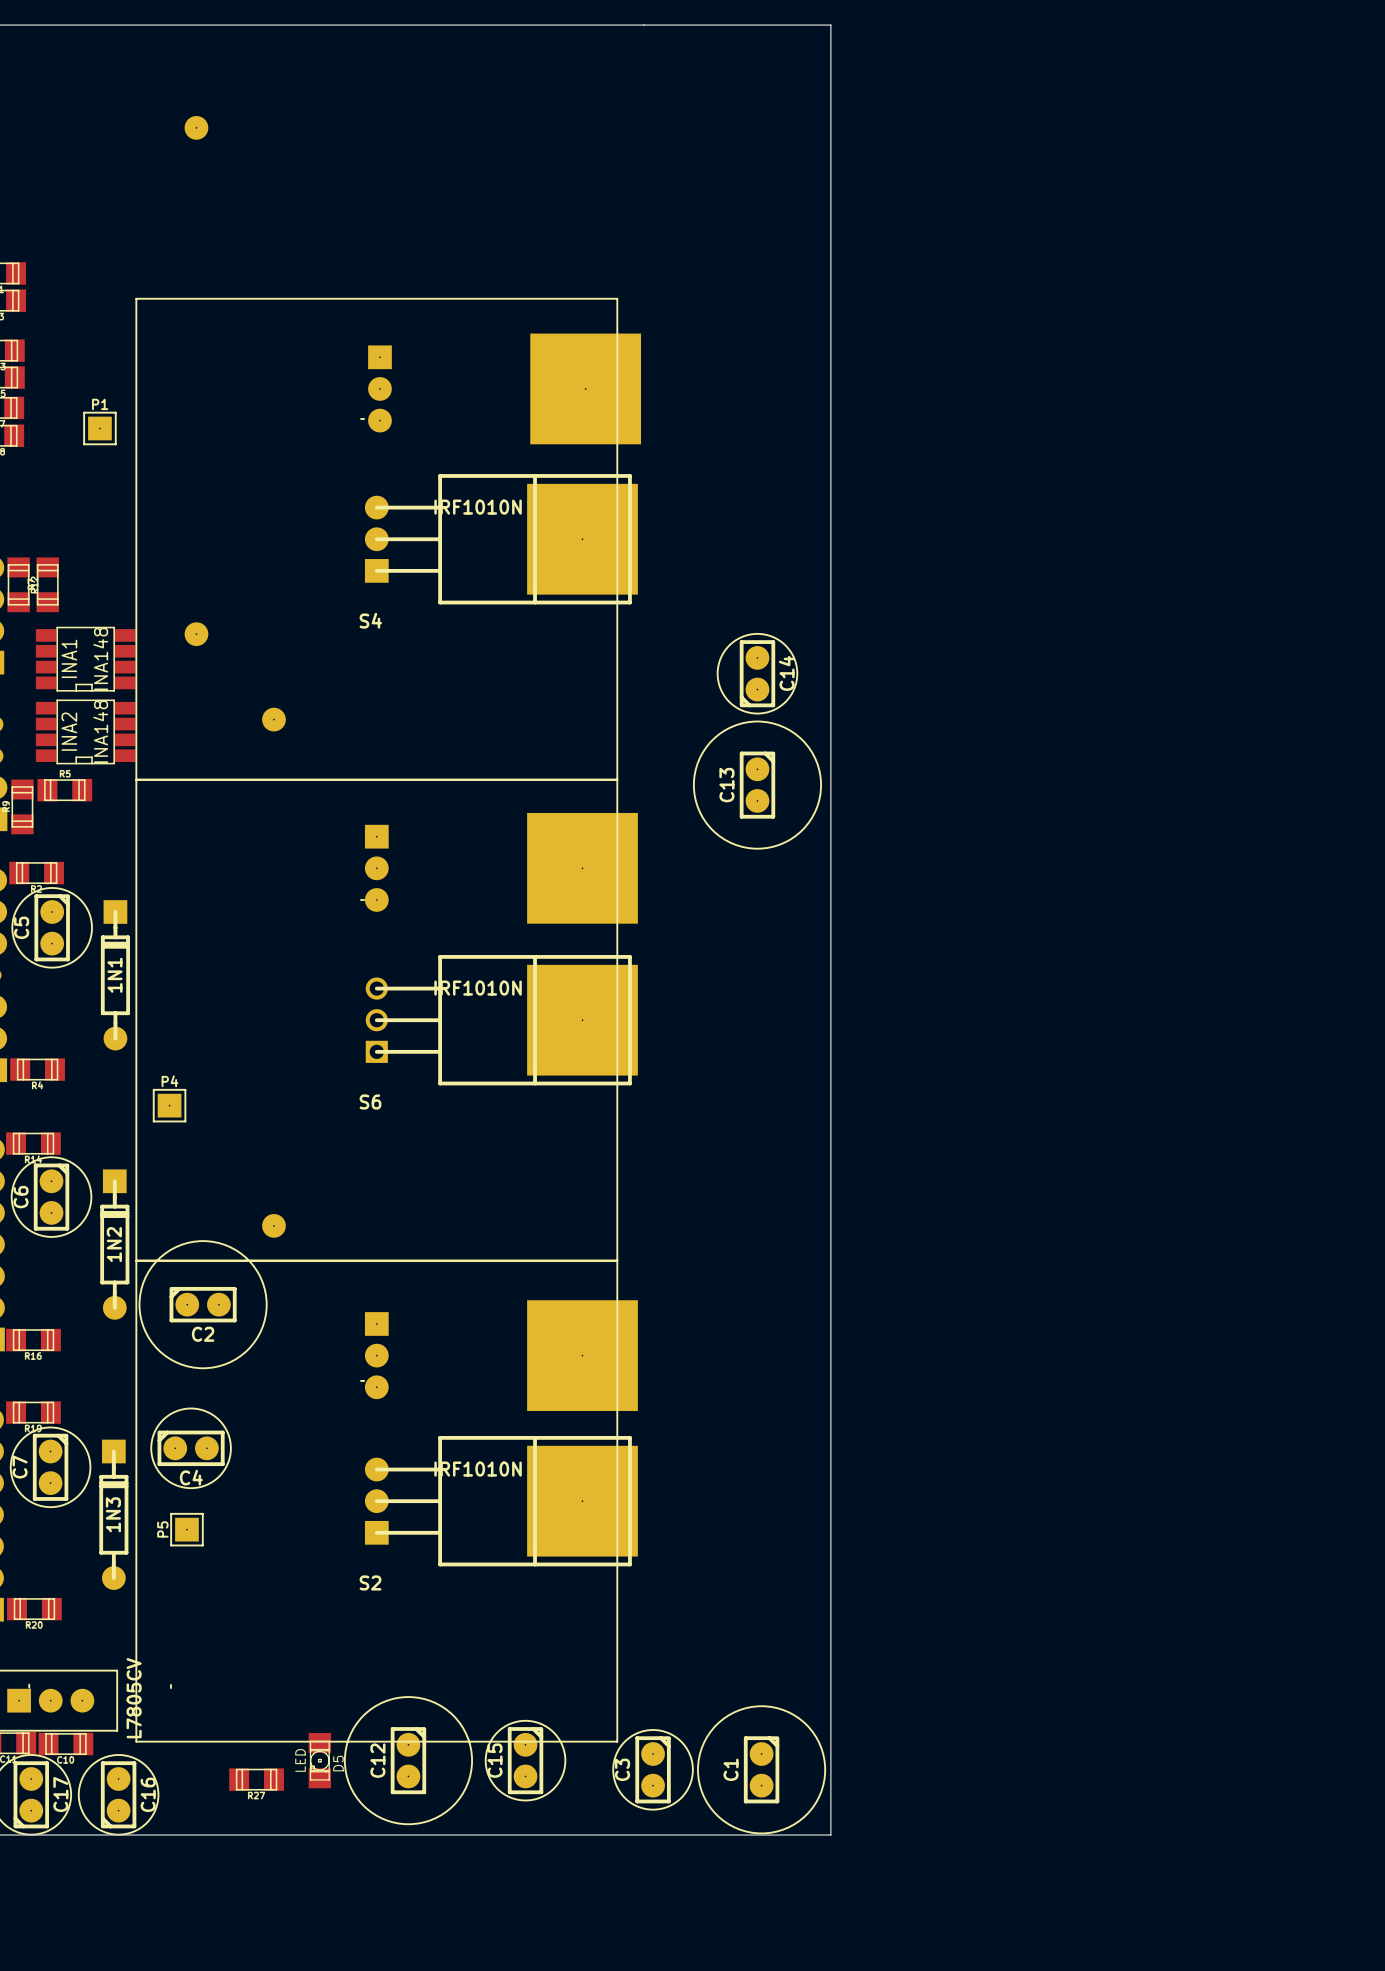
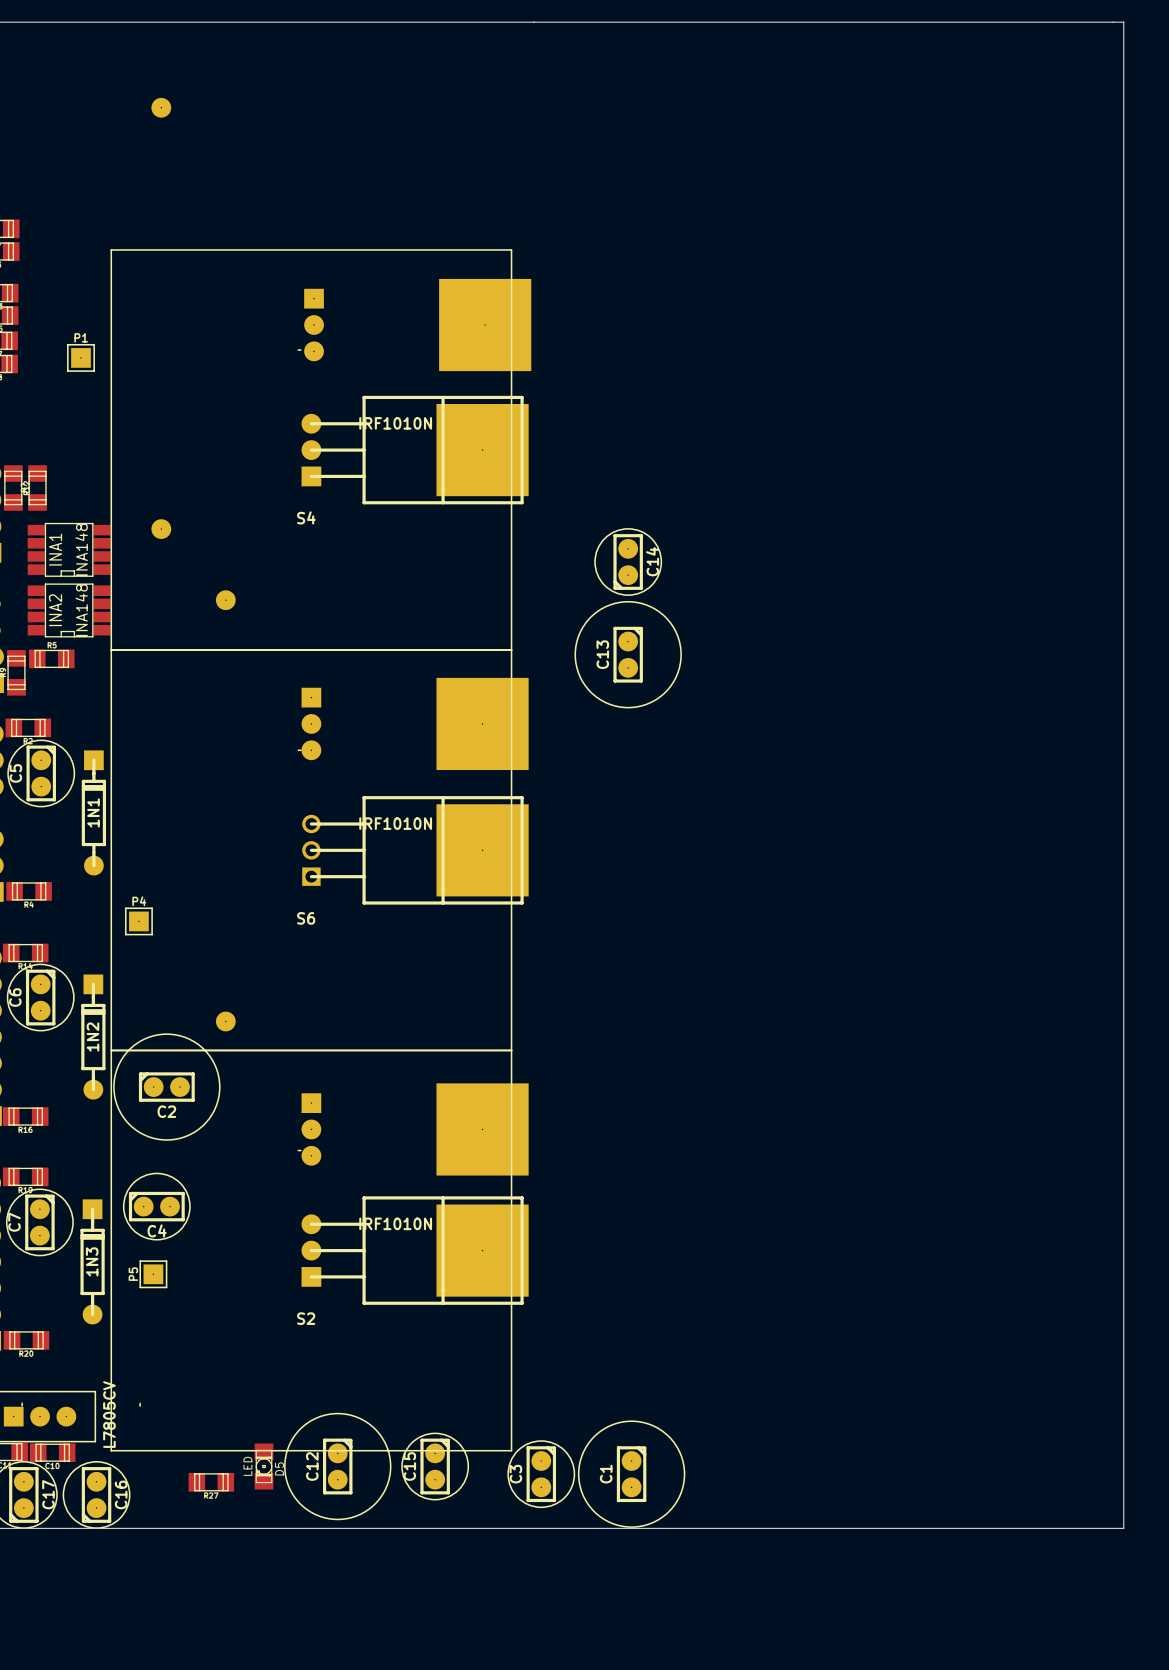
board edge: (830, 25) (830, 1835) -> (689, 22) (1123, 22) (1123, 1528) (689, 1528)

